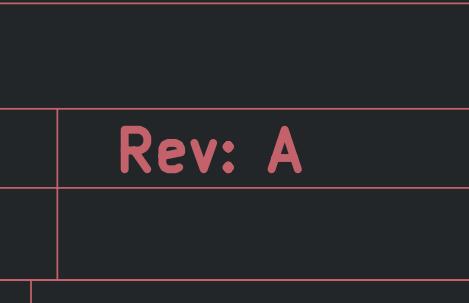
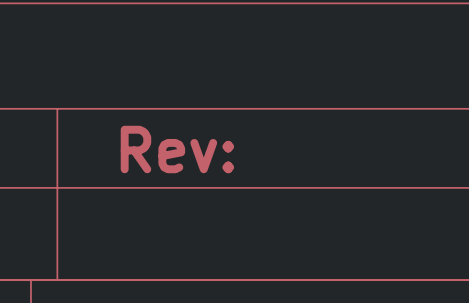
title block: Rev: A (211, 149) -> Rev: (177, 149)

